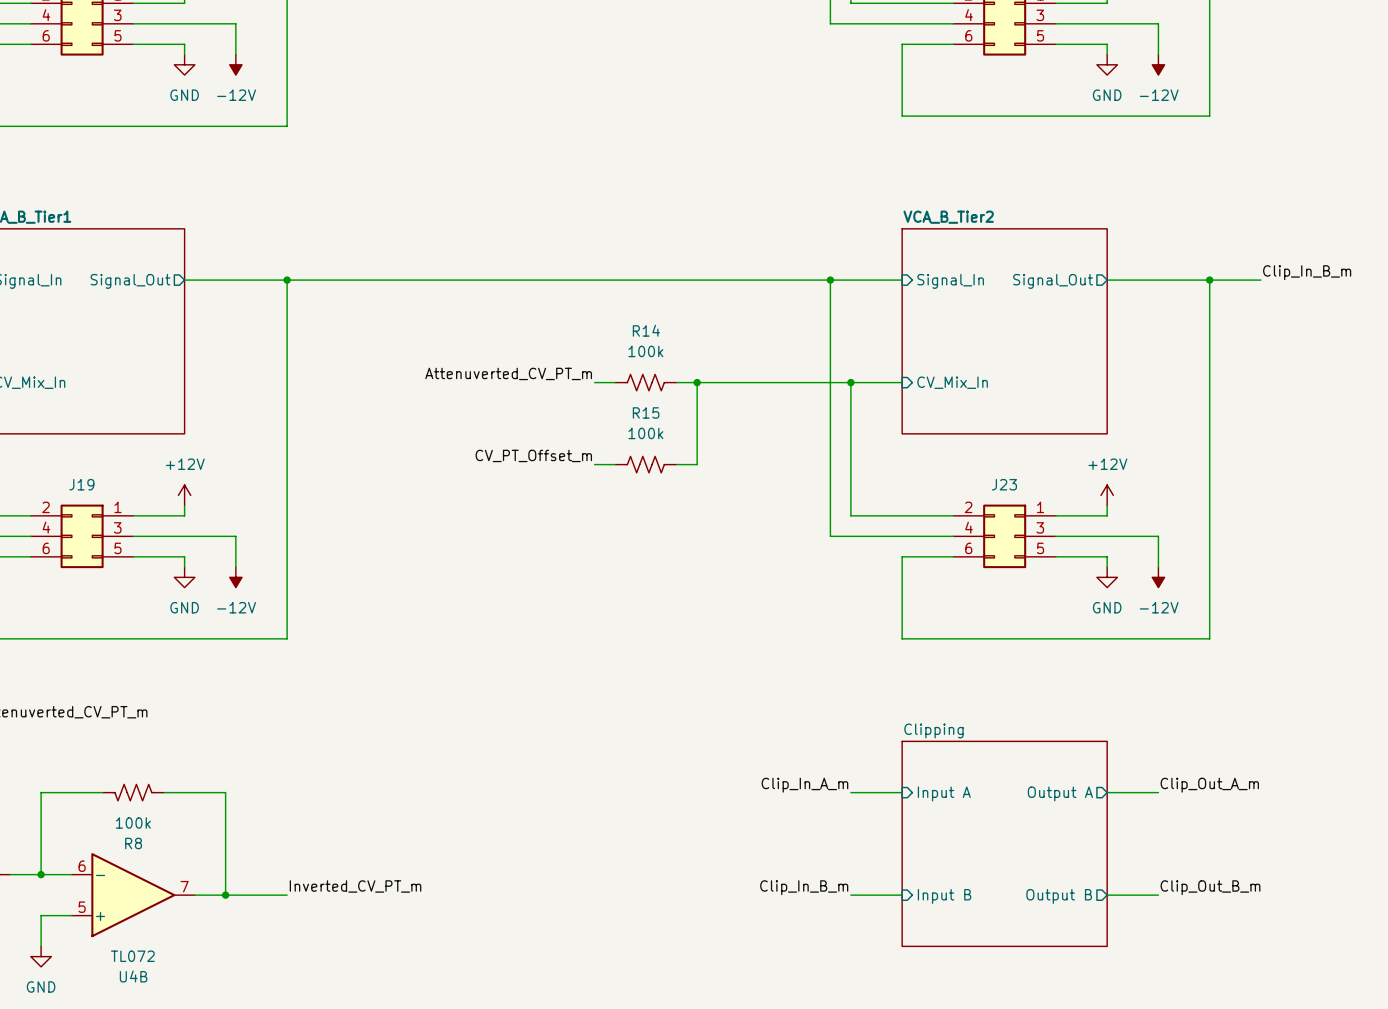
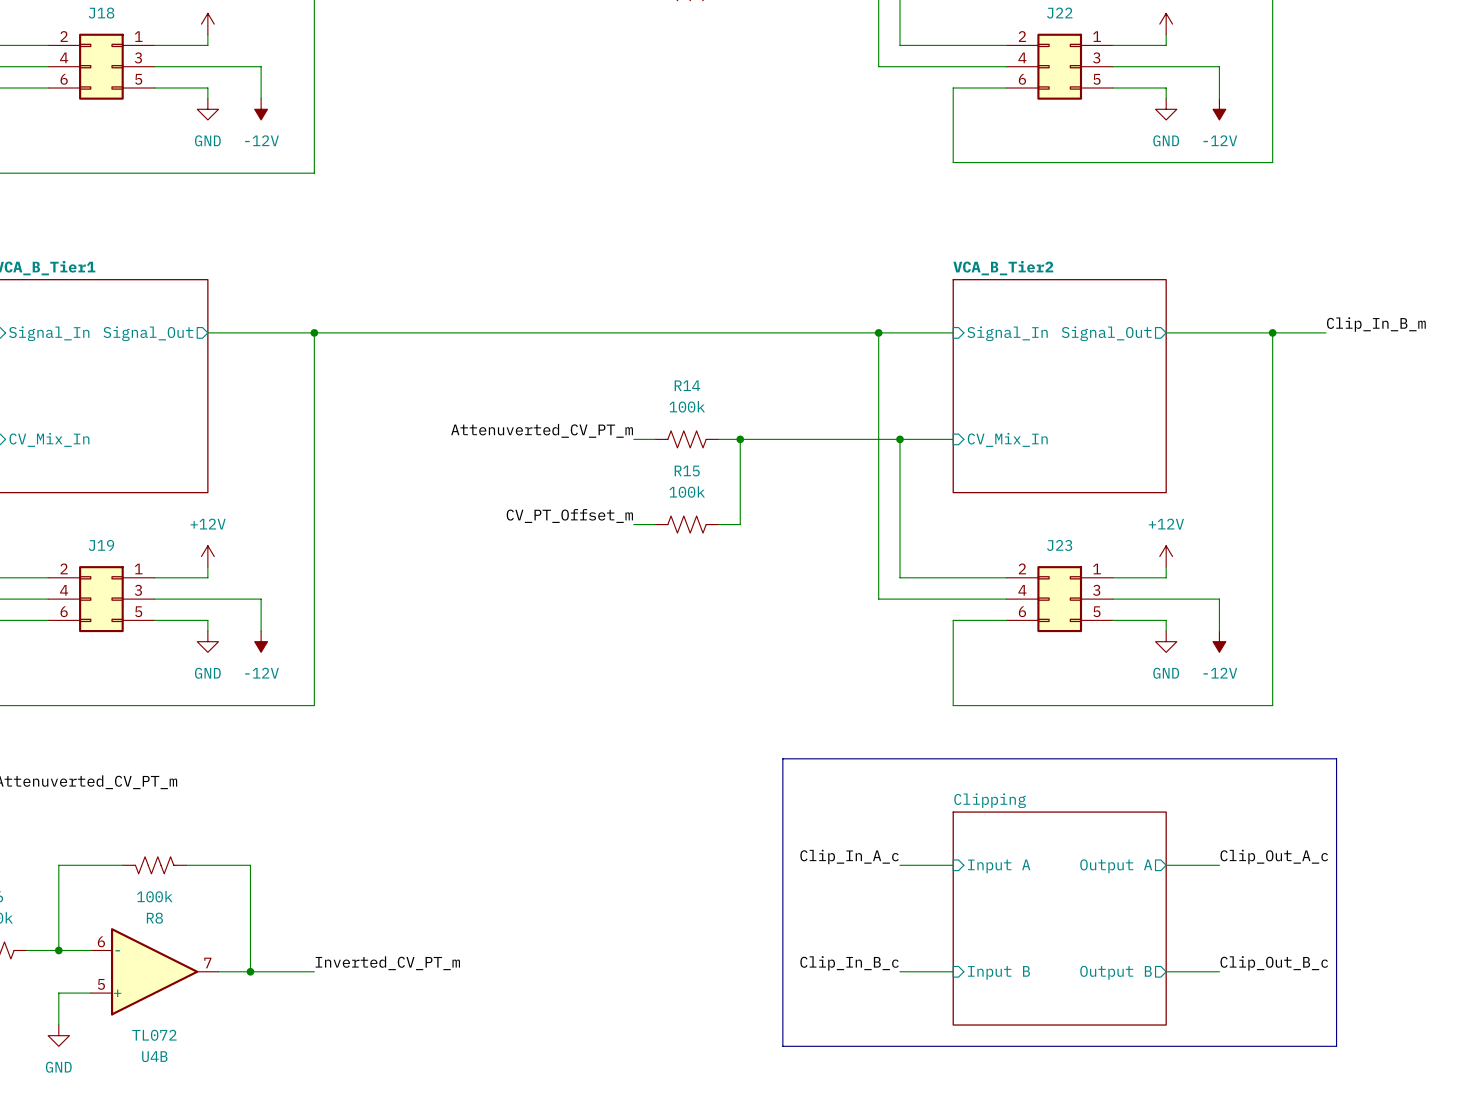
line: none -> (782, 758) (1336, 758) (1336, 1046) (782, 1046) (782, 758)
label: Clip_In_A_m (804, 785) -> Clip_In_A_c (849, 856)
label: Clip_Out_A_m (1209, 785) -> Clip_Out_A_c (1274, 856)
label: Clip_In_B_m (804, 887) -> Clip_In_B_c (849, 963)
label: Clip_Out_B_m (1210, 887) -> Clip_Out_B_c (1274, 963)

